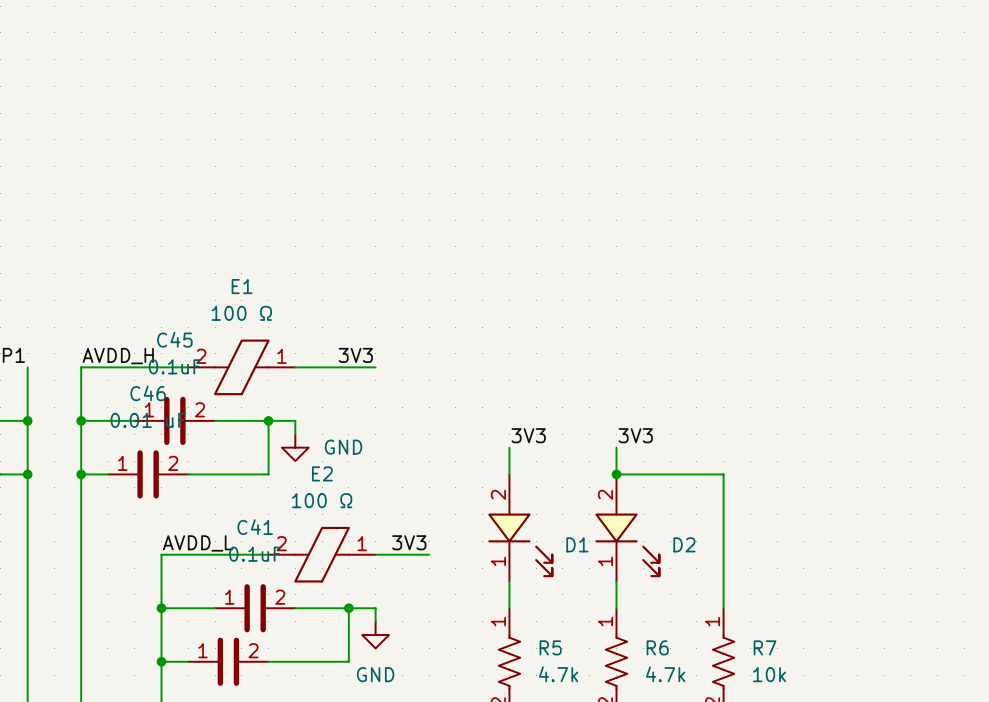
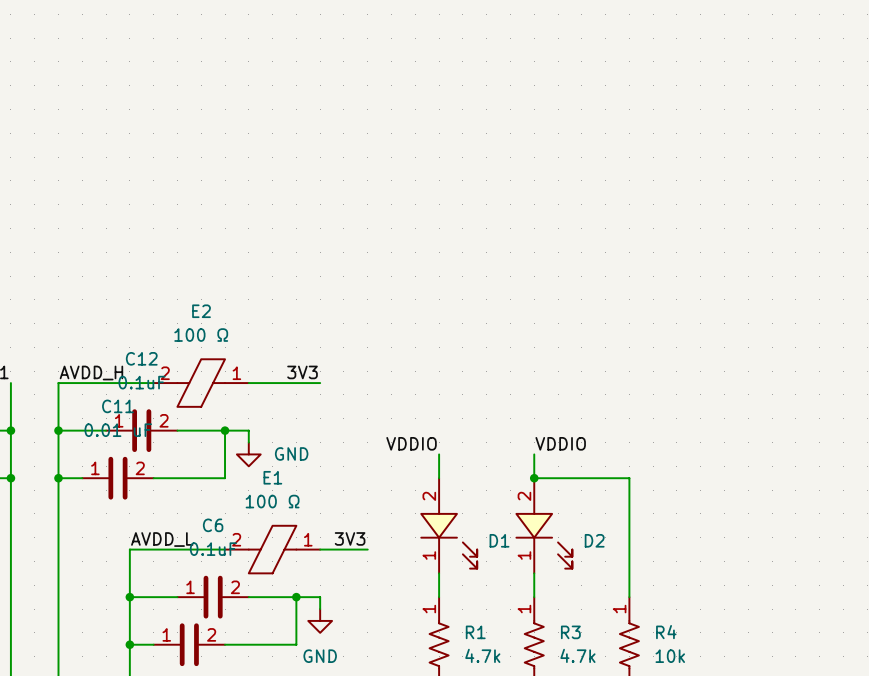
E1 name: E1 (242, 286) -> E2 (201, 311)
C45 name: C45 (174, 339) -> C12 (141, 358)
C46 name: C46 (148, 393) -> C11 (117, 406)
label: 3V3 (528, 435) -> VDDIO (411, 443)
label: 3V3 (635, 435) -> VDDIO (560, 443)
E2 name: E2 (322, 473) -> E1 (272, 477)
C41 name: C41 (255, 527) -> C6 (213, 525)
R5 name: R5 (550, 647) -> R1 (475, 632)
R6 name: R6 (657, 647) -> R3 (570, 632)
R7 name: R7 (765, 647) -> R4 (666, 632)

